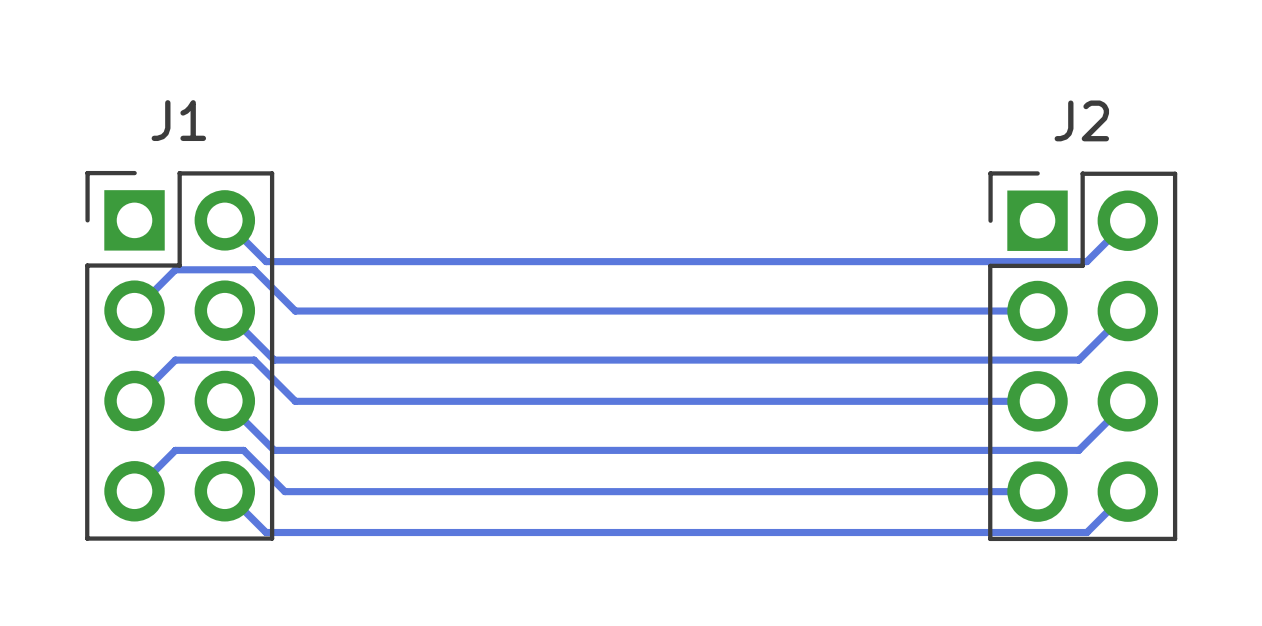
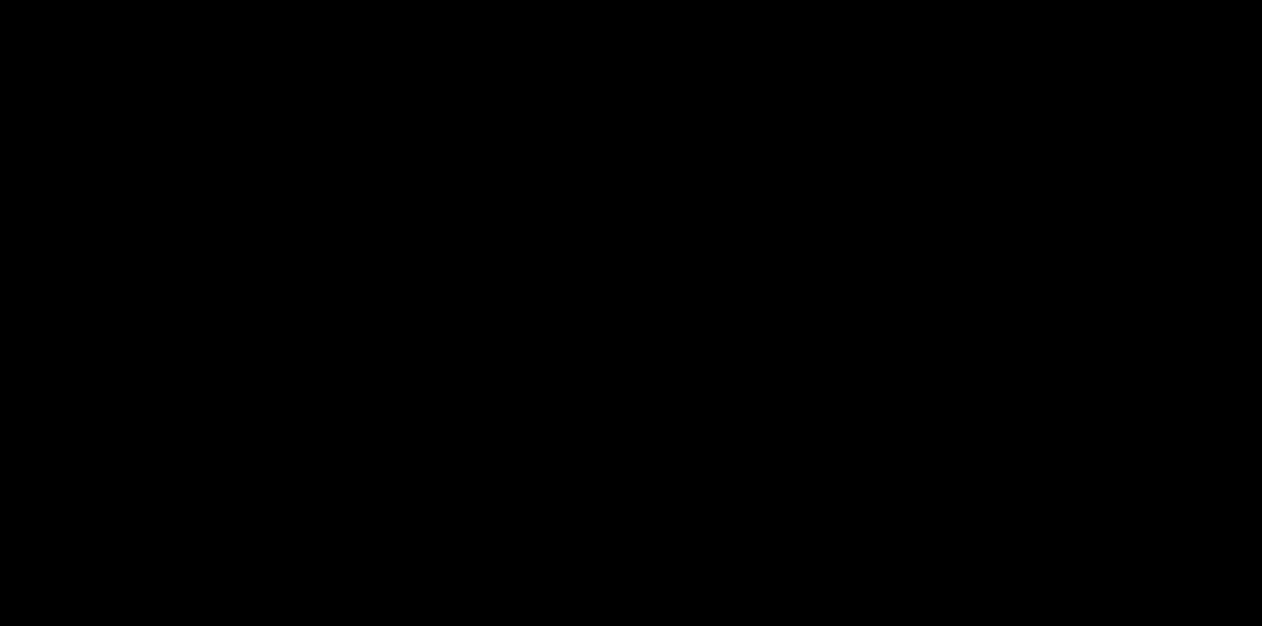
bottom track: (224, 220) (266, 261) (1086, 261) (1127, 220) -> none
bottom track: (134, 310) (175, 269) (254, 269) (295, 311) (1037, 311) -> none
bottom track: (224, 310) (274, 360) (1078, 360) (1127, 311) -> none
J1: (179, 355) -> none
J2: (1082, 356) -> none
bottom track: (134, 400) (175, 360) (254, 360) (295, 401) (1037, 401) -> none
bottom track: (224, 400) (274, 450) (1078, 450) (1127, 401) -> none
bottom track: (134, 491) (175, 450) (243, 450) (284, 491) (1037, 491) -> none
bottom track: (224, 491) (266, 532) (1086, 532) (1127, 491) -> none

